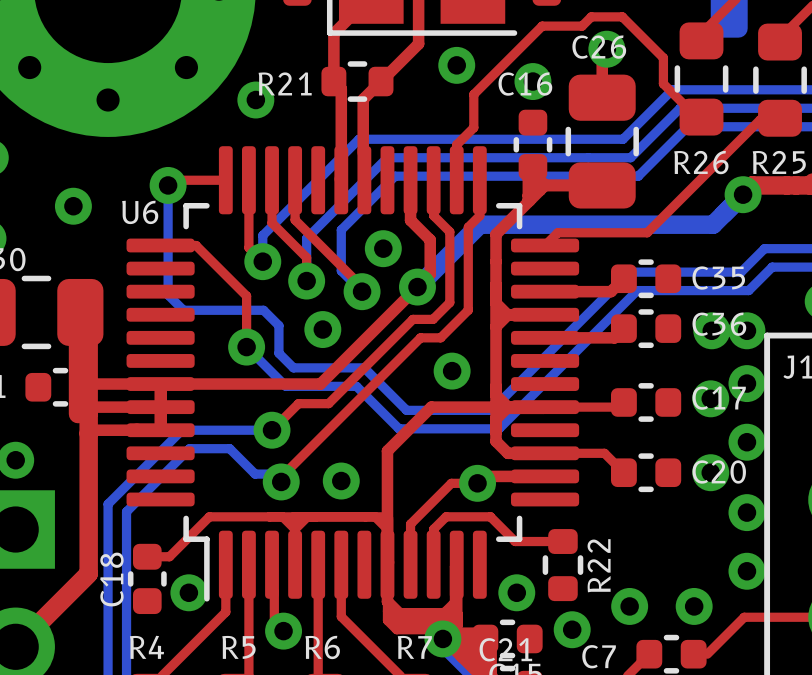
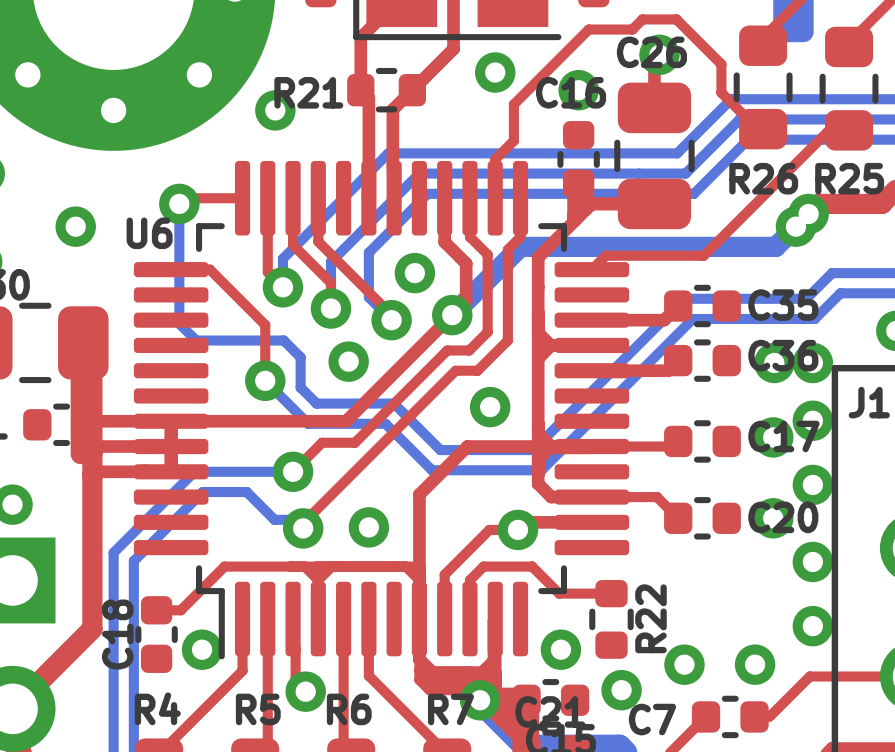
via: none -> (795, 226)

